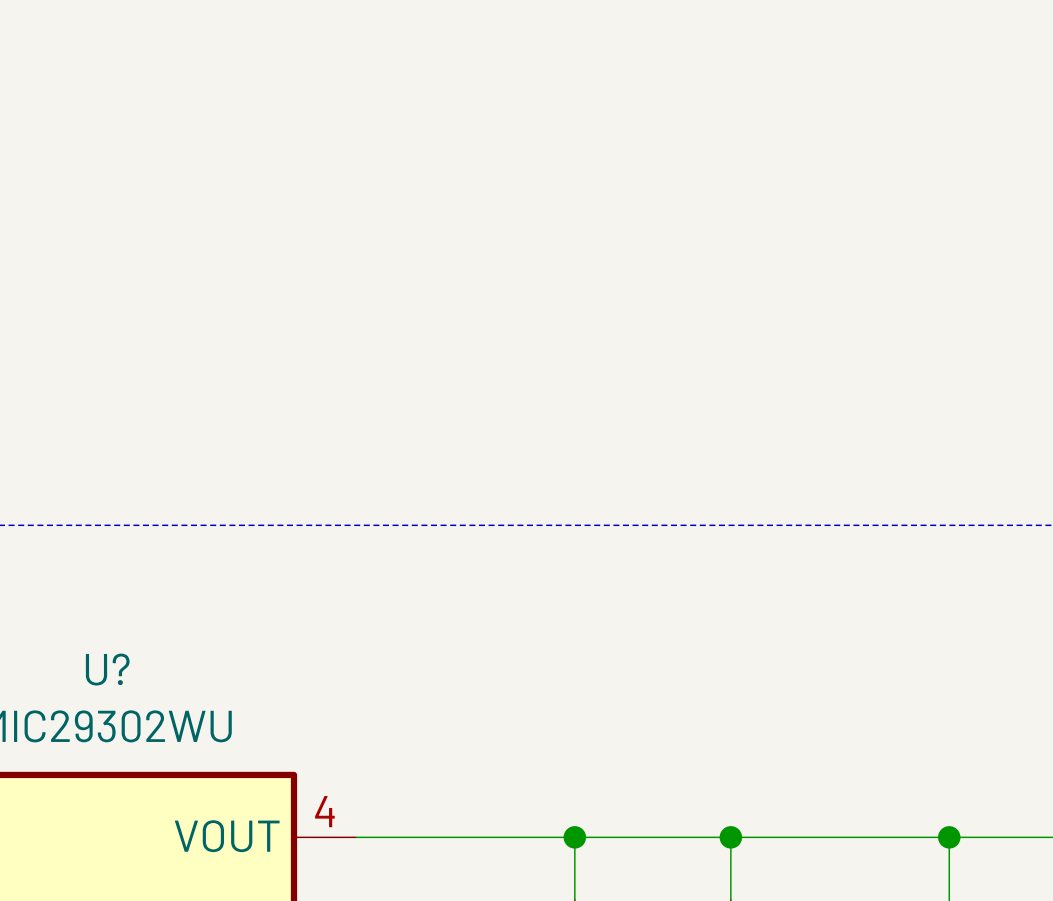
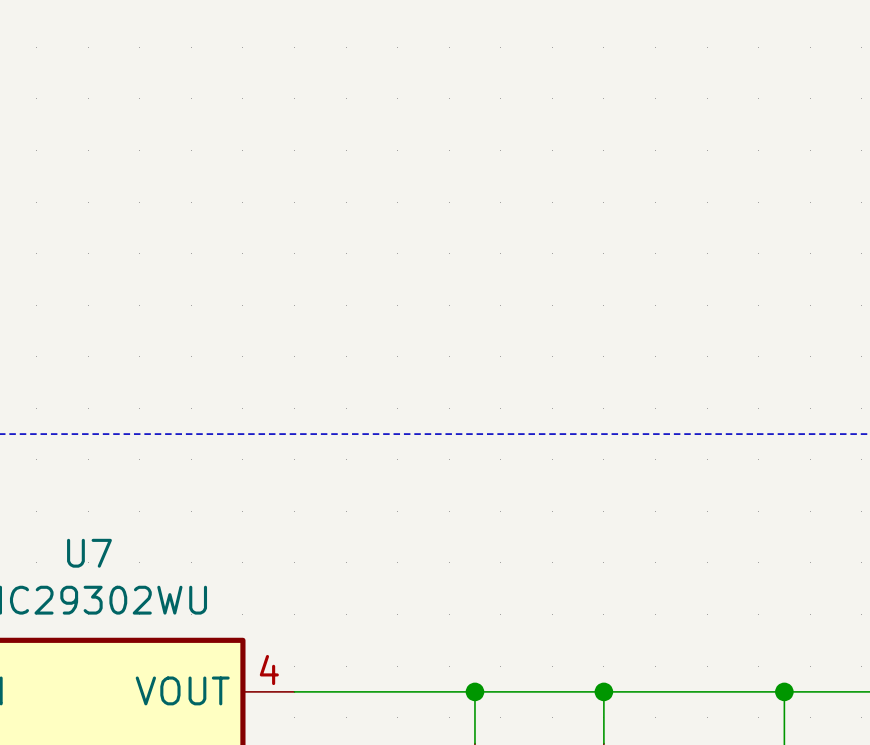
U? name: U? (107, 669) -> U7 (89, 553)

